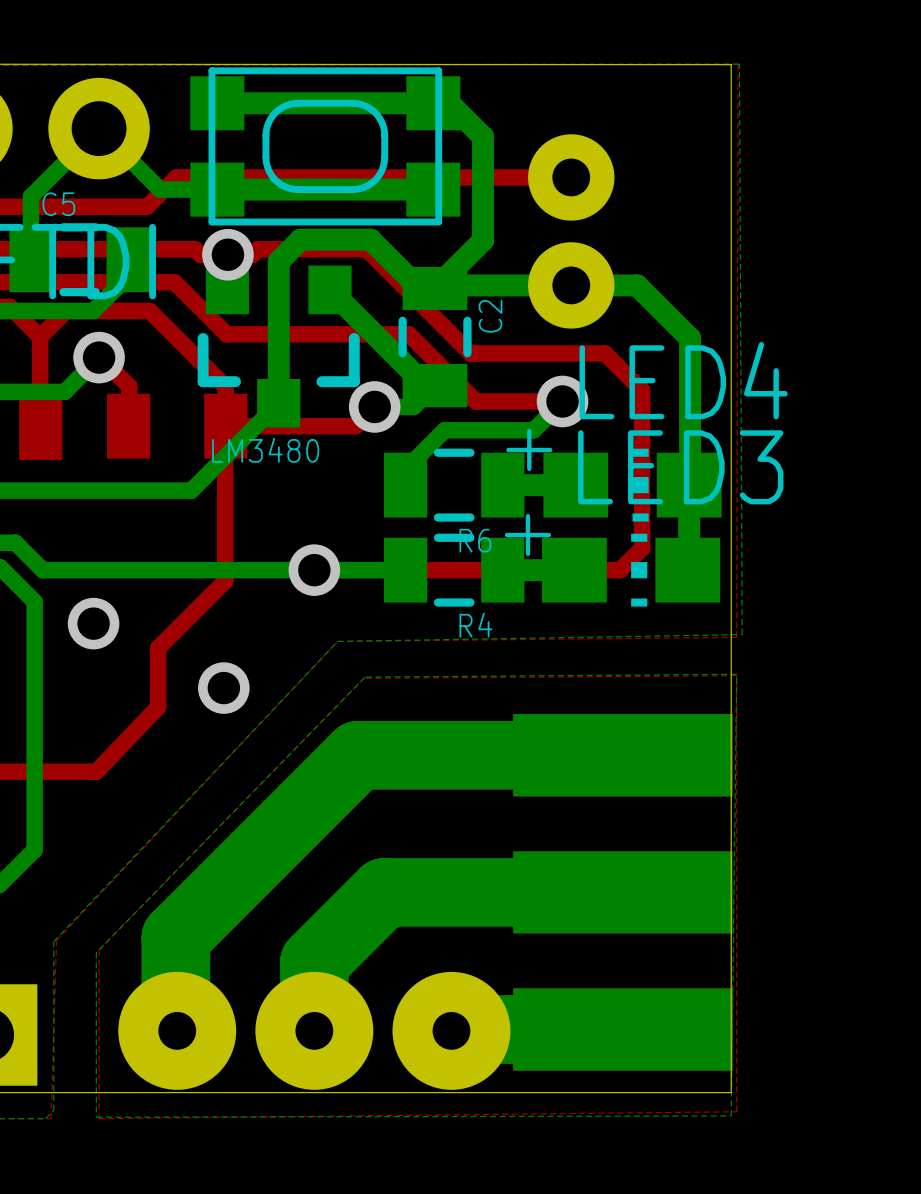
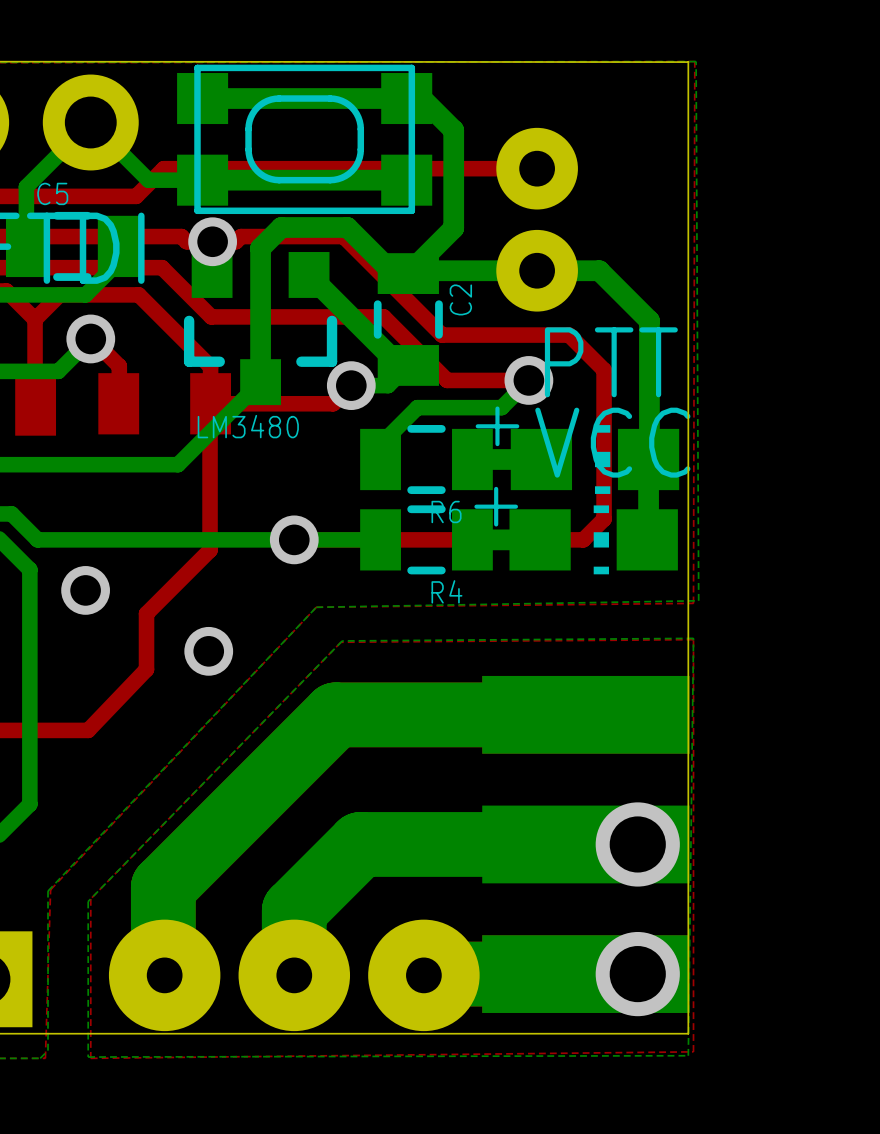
LED4 name: LED4 (683, 380) -> PTT (611, 362)
LED3 name: LED3 (680, 467) -> VCC (612, 442)
via: none -> (637, 844)
via: none -> (637, 974)

